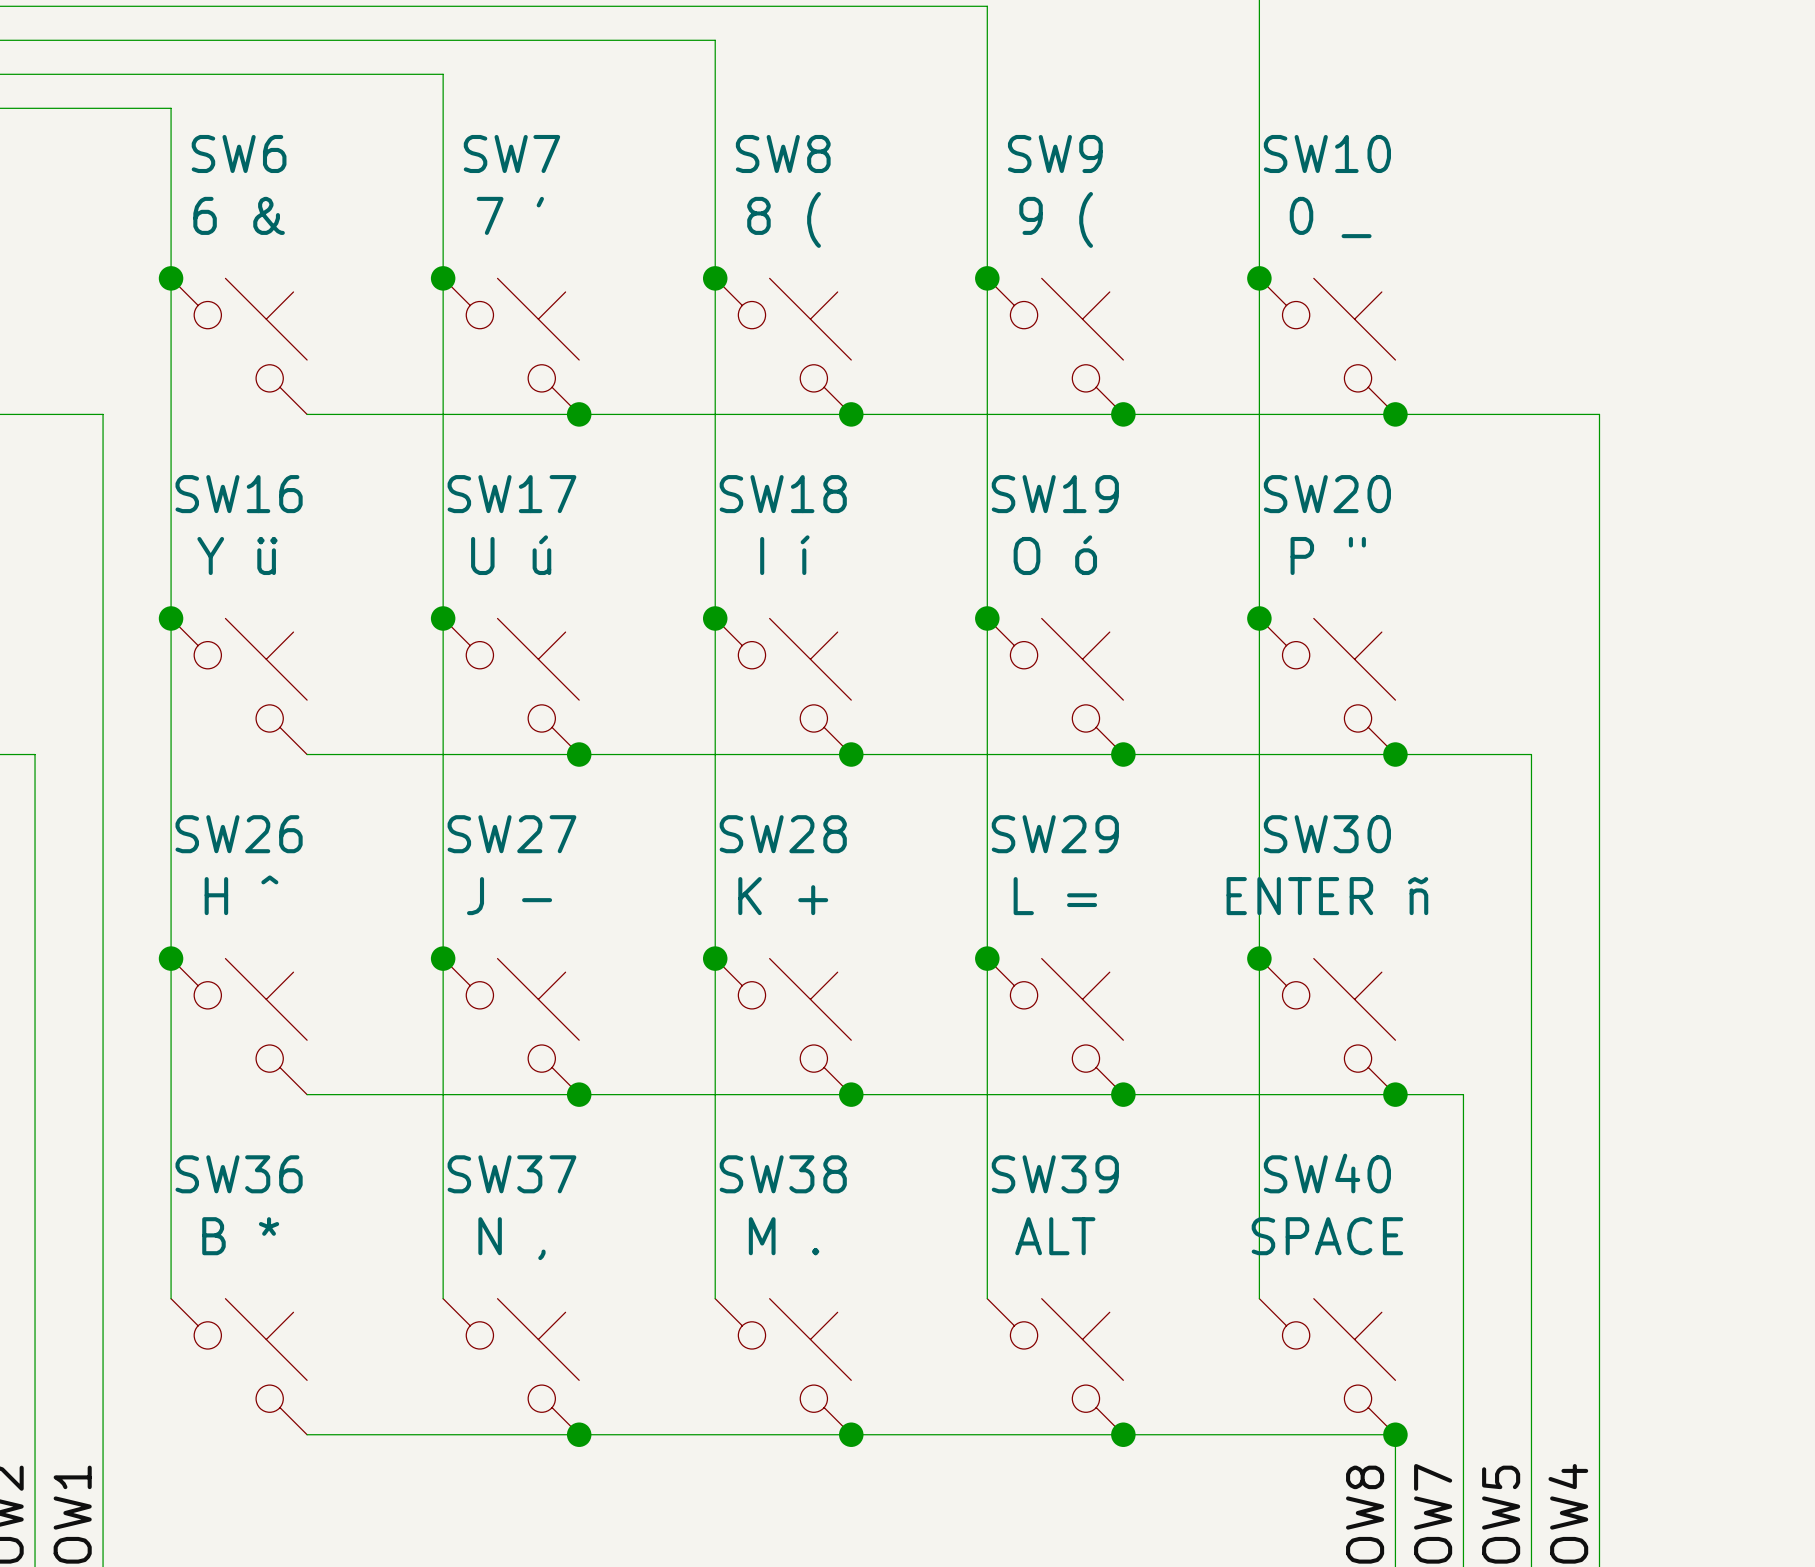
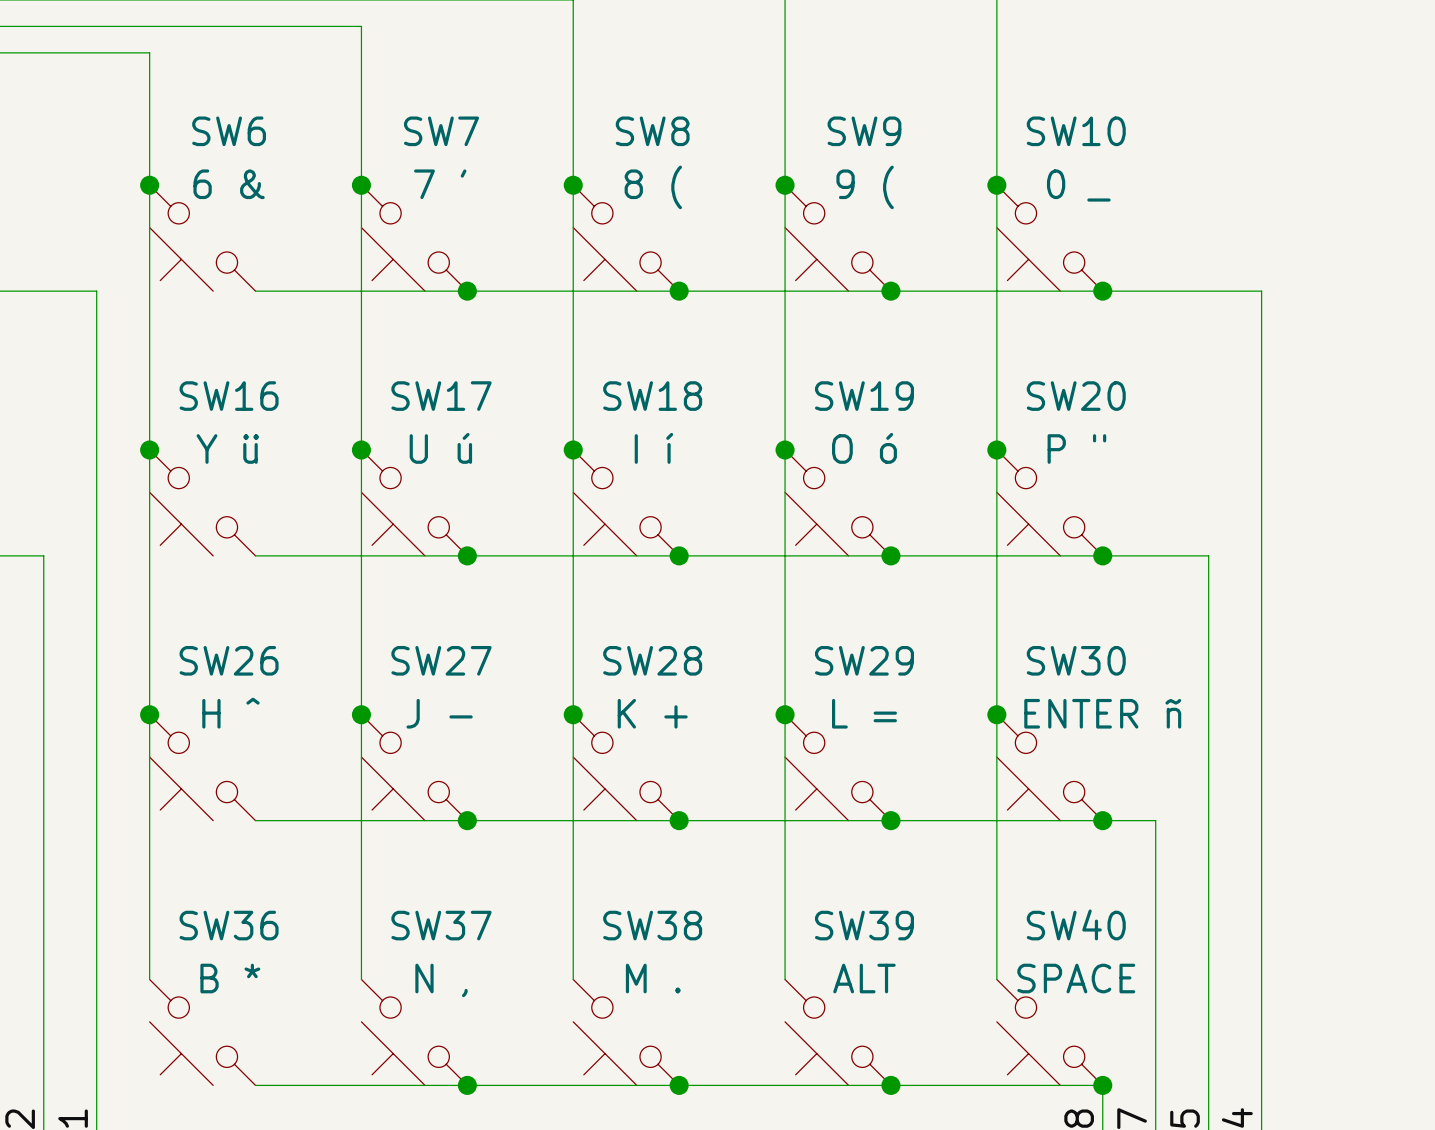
SW6 name position: SW6 (239, 153) -> SW6 (229, 131)
SW7 name position: SW7 (511, 153) -> SW7 (441, 131)
SW8 name position: SW8 (783, 153) -> SW8 (652, 131)
SW9 name position: SW9 (1055, 153) -> SW9 (864, 131)
SW10 name position: SW10 (1327, 153) -> SW10 (1076, 131)
SW6 value position: 6 & (239, 215) -> 6 & (229, 184)
SW7 value position: 7 ' (510, 215) -> 7 ' (440, 184)
SW10 value position: 0 _ (1330, 217) -> 0 _ (1078, 185)
SW8 value position: 8 ( (784, 219) -> 8 ( (653, 187)
SW9 value position: 9 ( (1056, 219) -> 9 ( (865, 187)
SW6 rotation: 0° (239, 346) -> 180° (202, 238)
SW7 rotation: 0° (511, 346) -> 180° (414, 238)
SW8 rotation: 0° (783, 346) -> 180° (626, 238)
SW9 rotation: 0° (1055, 346) -> 180° (838, 238)
SW10 rotation: 0° (1327, 346) -> 180° (1049, 238)
SW16 name position: SW16 (239, 494) -> SW16 (229, 396)
SW17 name position: SW17 (511, 494) -> SW17 (441, 396)
SW18 name position: SW18 (783, 494) -> SW18 (652, 396)
SW19 name position: SW19 (1055, 494) -> SW19 (864, 396)
SW20 name position: SW20 (1327, 494) -> SW20 (1076, 396)
SW16 value position: Y ü (237, 555) -> Y ü (227, 449)
SW17 value position: U ú (511, 555) -> U ú (440, 448)
SW18 value position: I í (784, 555) -> I í (653, 448)
SW19 value position: O ó (1055, 555) -> O ó (864, 448)
SW20 value position: P " (1328, 555) -> P " (1076, 449)
SW16 rotation: 0° (239, 686) -> 180° (202, 502)
SW17 rotation: 0° (511, 686) -> 180° (414, 502)
SW18 rotation: 0° (783, 686) -> 180° (626, 502)
SW19 rotation: 0° (1055, 686) -> 180° (838, 502)
SW20 rotation: 0° (1327, 686) -> 180° (1049, 502)
SW26 name position: SW26 (239, 834) -> SW26 (229, 660)
SW27 name position: SW27 (511, 834) -> SW27 (441, 660)
SW28 name position: SW28 (783, 834) -> SW28 (652, 660)
SW29 name position: SW29 (1055, 834) -> SW29 (864, 660)
SW30 name position: SW30 (1327, 834) -> SW30 (1076, 660)
SW26 value position: H ^ (241, 895) -> H ^ (230, 713)
SW27 value position: J - (509, 896) -> J - (439, 713)
SW28 value position: K + (783, 896) -> K + (652, 713)
SW29 value position: L = (1055, 896) -> L = (864, 713)
SW30 value position: ENTER ñ (1327, 896) -> ENTER ñ (1102, 713)
SW26 rotation: 0° (239, 1026) -> 180° (202, 767)
SW27 rotation: 0° (511, 1026) -> 180° (414, 767)
SW28 rotation: 0° (783, 1026) -> 180° (626, 767)
SW29 rotation: 0° (1055, 1026) -> 180° (838, 767)
SW30 rotation: 0° (1327, 1026) -> 180° (1049, 767)
SW40 name position: SW40 (1327, 1173) -> SW40 (1076, 924)
SW36 name position: SW36 (239, 1174) -> SW36 (229, 925)
SW37 name position: SW37 (511, 1174) -> SW37 (441, 925)
SW38 name position: SW38 (783, 1174) -> SW38 (652, 925)
SW39 name position: SW39 (1055, 1174) -> SW39 (864, 925)
SW36 value position: B * (240, 1236) -> B * (230, 978)
SW38 value position: M . (784, 1236) -> M . (653, 978)
SW39 value position: ALT (1055, 1236) -> ALT (864, 978)
SW40 value position: SPACE (1327, 1236) -> SPACE (1076, 978)
SW37 value position: N , (511, 1238) -> N , (441, 980)
SW36 rotation: 0° (239, 1366) -> 180° (202, 1032)
SW37 rotation: 0° (511, 1366) -> 180° (414, 1032)
SW38 rotation: 0° (783, 1366) -> 180° (626, 1032)
SW39 rotation: 0° (1055, 1366) -> 180° (838, 1032)
SW40 rotation: 0° (1327, 1366) -> 180° (1049, 1032)

